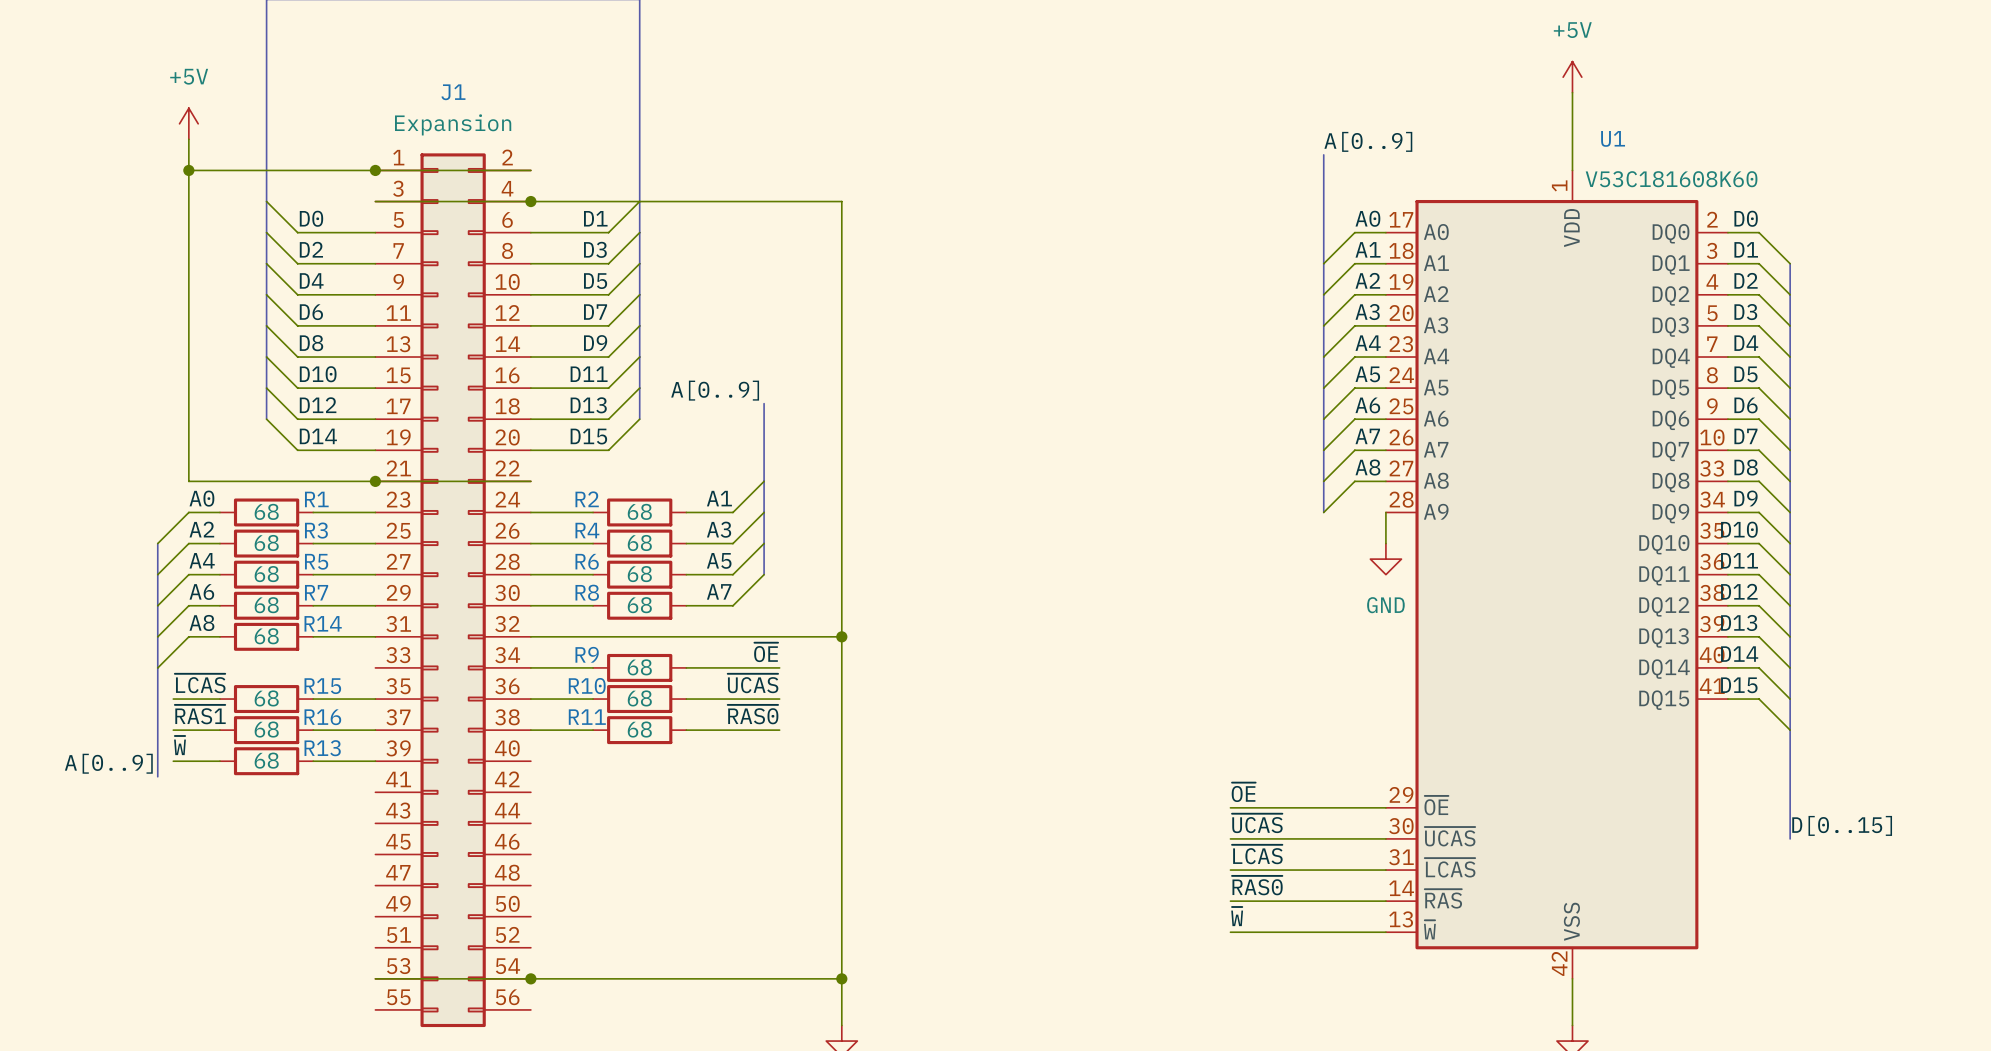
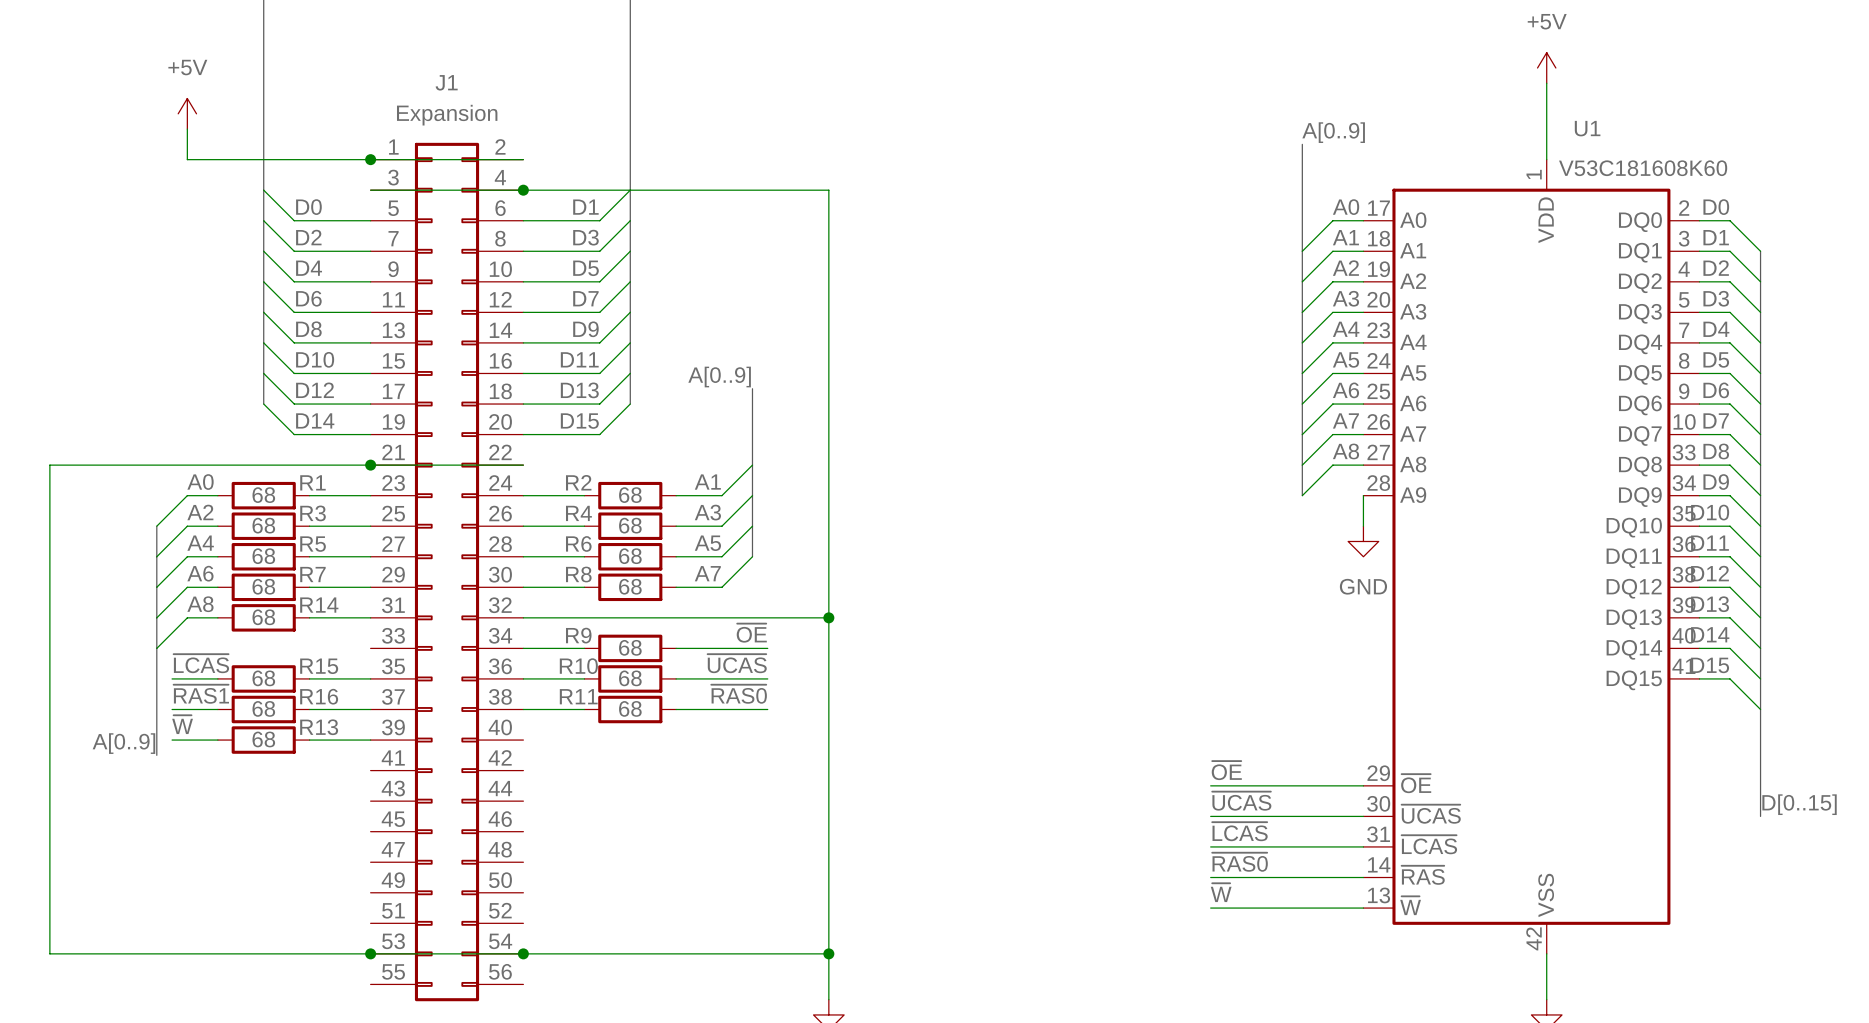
wire: (188, 170) (188, 481) -> (370, 953) (49, 953) (49, 465) (187, 465)
junction: (188, 170) -> none
junction: none -> (370, 953)

